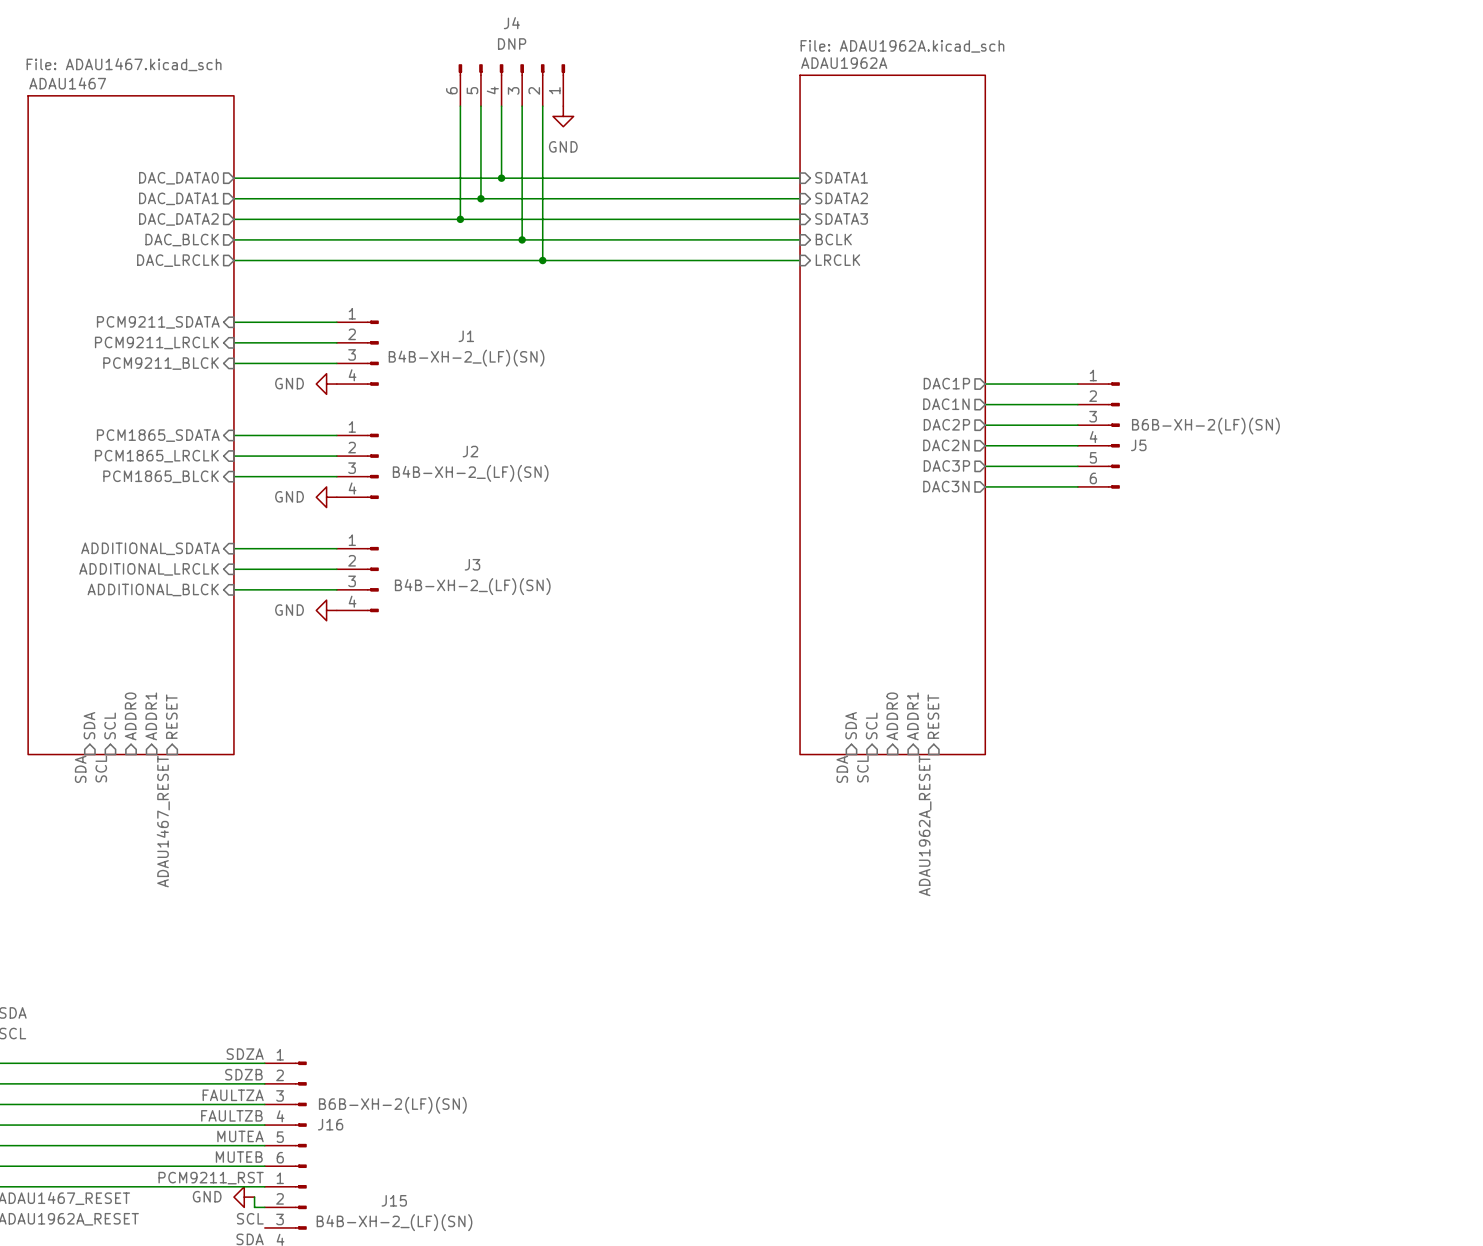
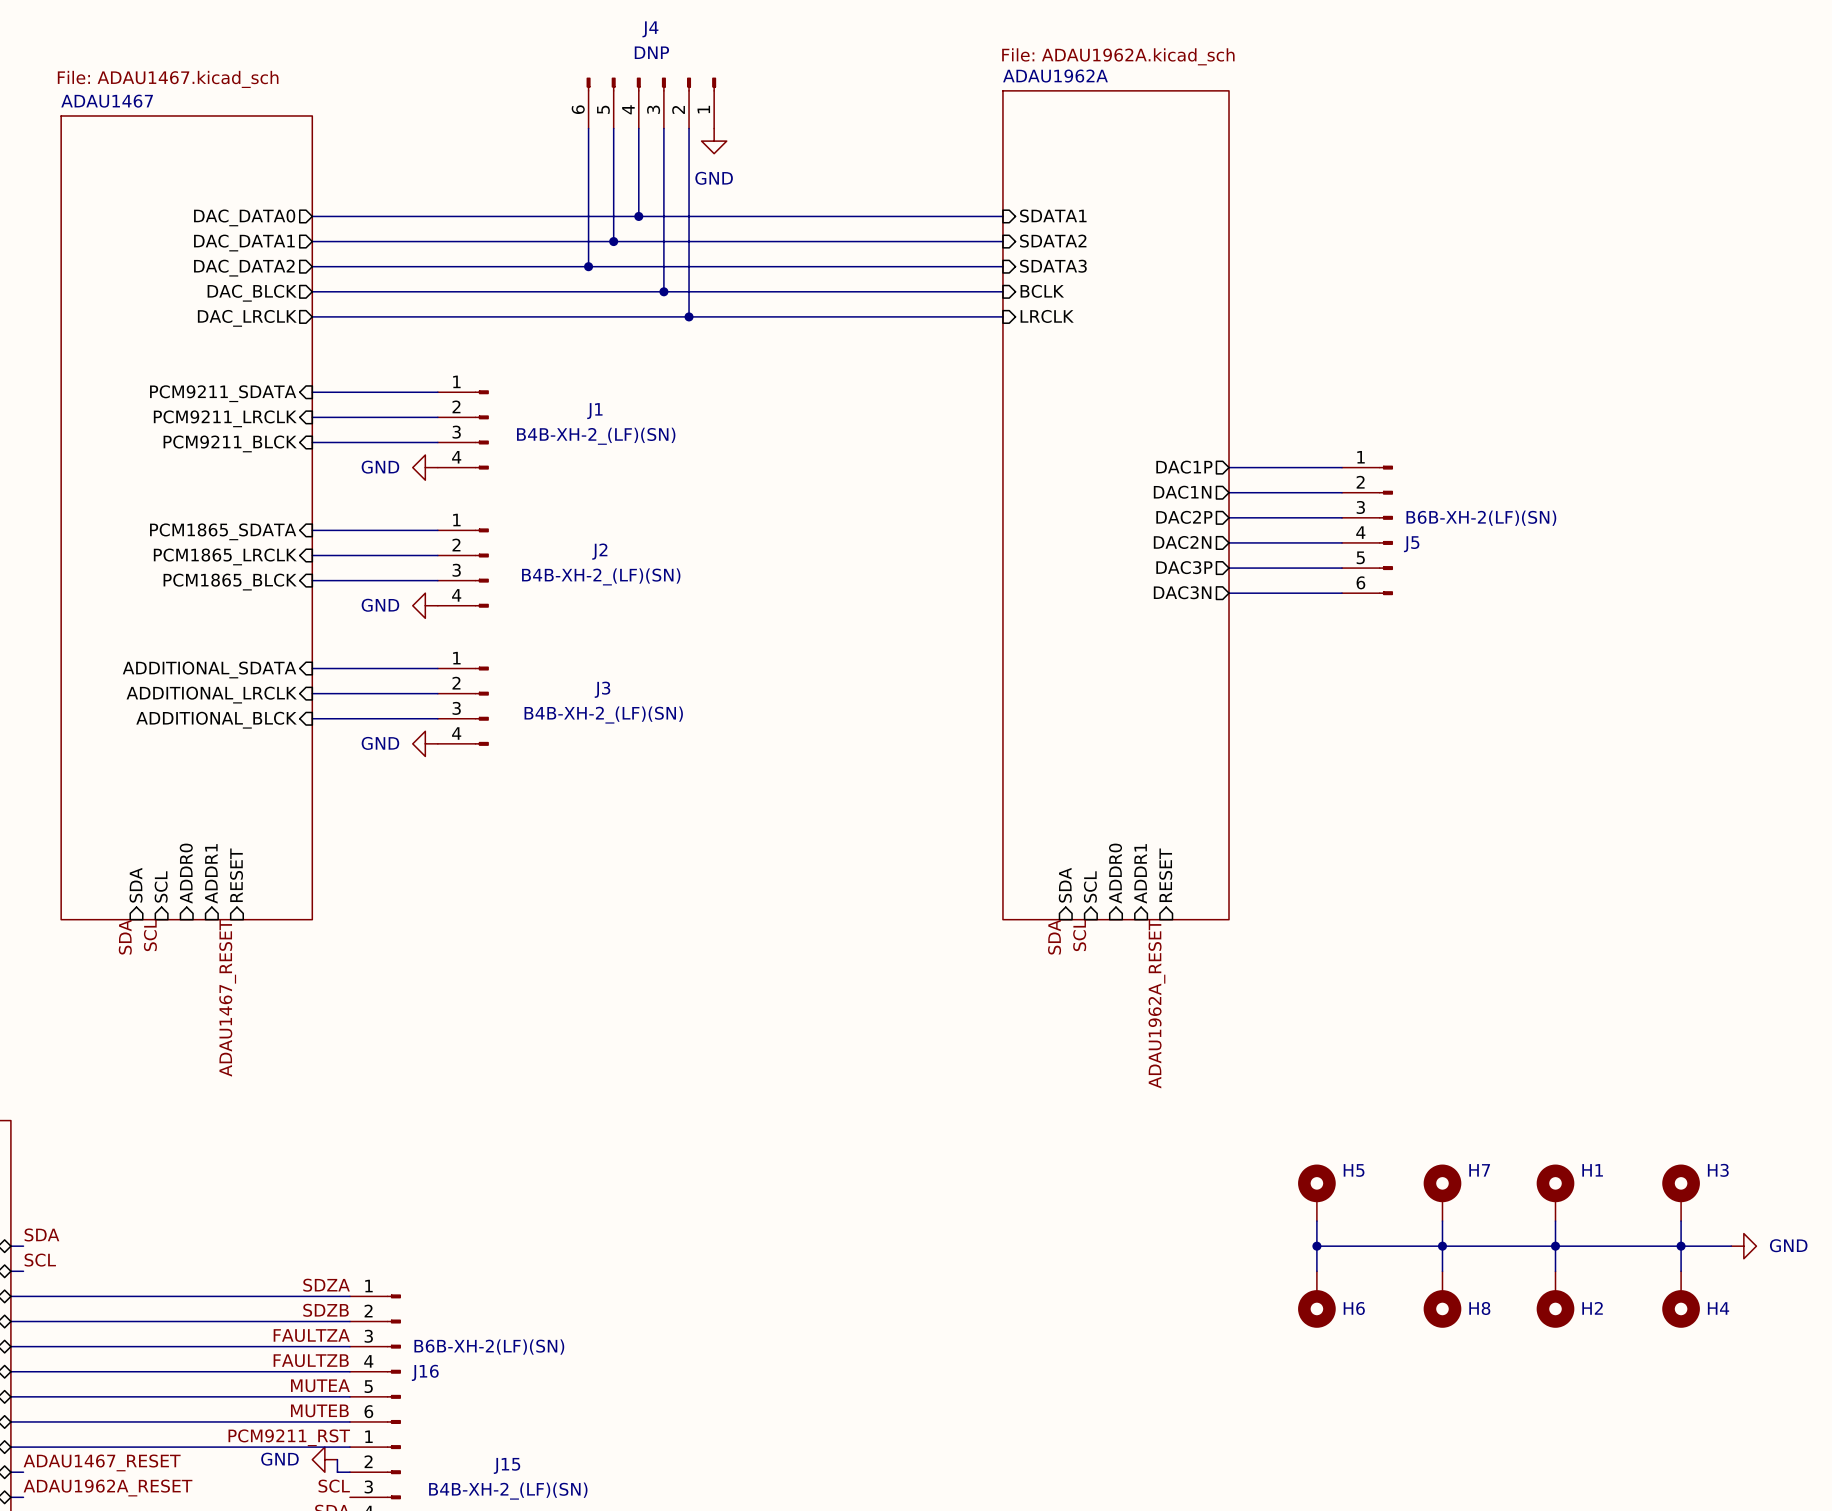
H5: none -> (1316, 1192)
H7: none -> (1442, 1192)
H1: none -> (1555, 1192)
H3: none -> (1681, 1192)
wire: none -> (1316, 1221) (1316, 1271)
wire: none -> (1442, 1221) (1442, 1271)
wire: none -> (1555, 1221) (1555, 1271)
wire: none -> (1681, 1221) (1681, 1271)
wire: none -> (1316, 1246) (1731, 1246)
junction: none -> (1316, 1246)
junction: none -> (1442, 1246)
junction: none -> (1555, 1246)
junction: none -> (1681, 1246)
power symbol: none -> GND (1743, 1246)
H6: none -> (1316, 1299)
H8: none -> (1442, 1299)
H2: none -> (1555, 1299)
H4: none -> (1681, 1299)

